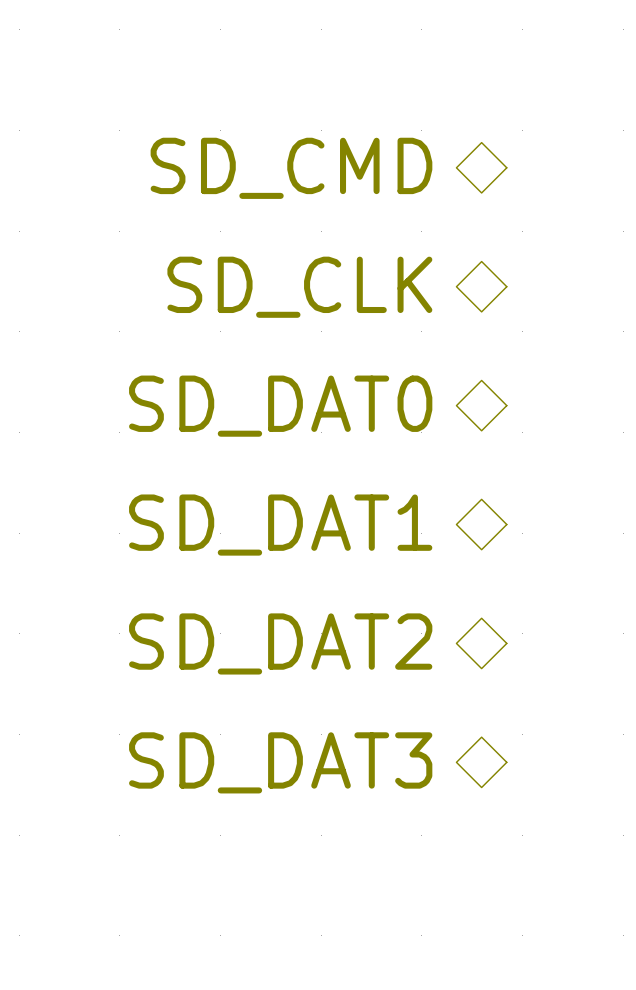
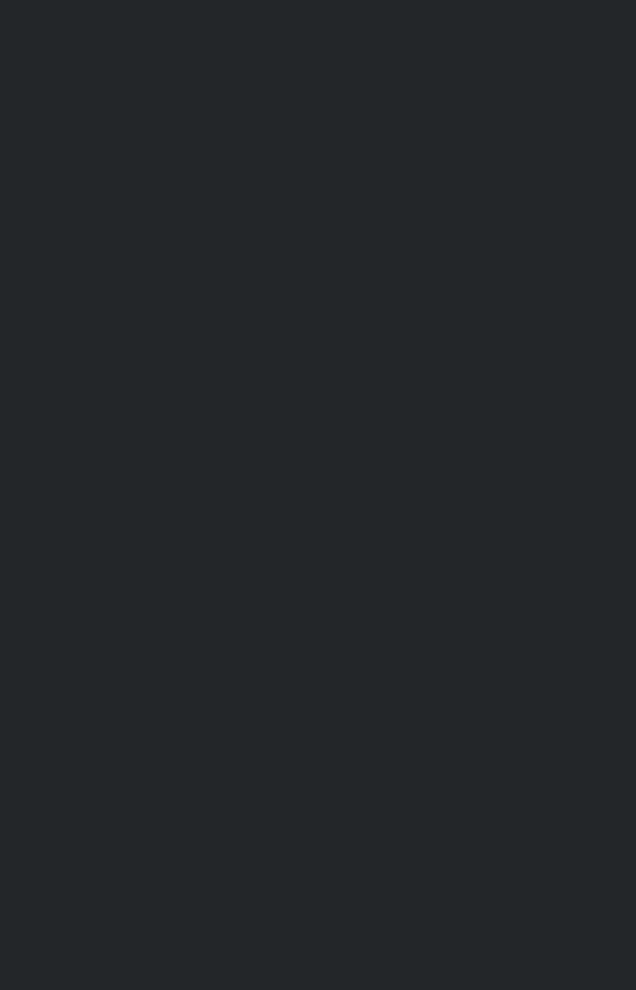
hierarchical label: SD_CMD (291, 168) -> none
hierarchical label: SD_CLK (299, 287) -> none
hierarchical label: SD_DAT0 (280, 406) -> none
hierarchical label: SD_DAT1 (280, 525) -> none
hierarchical label: SD_DAT2 (280, 643) -> none
hierarchical label: SD_DAT3 (280, 762) -> none

